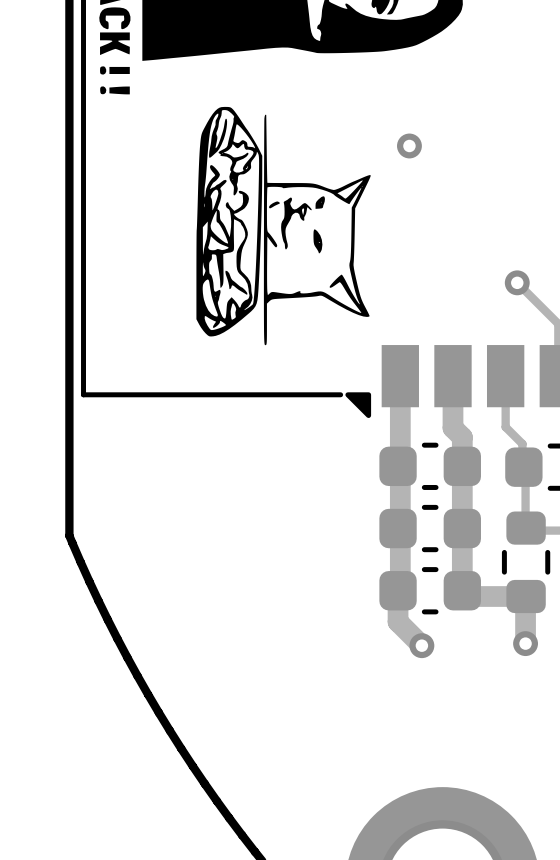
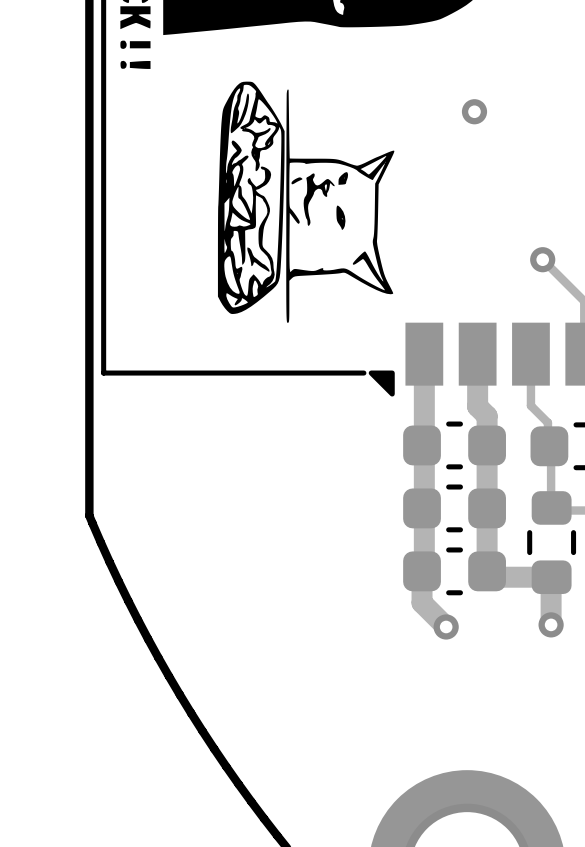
via position: (409, 145) -> (474, 111)

